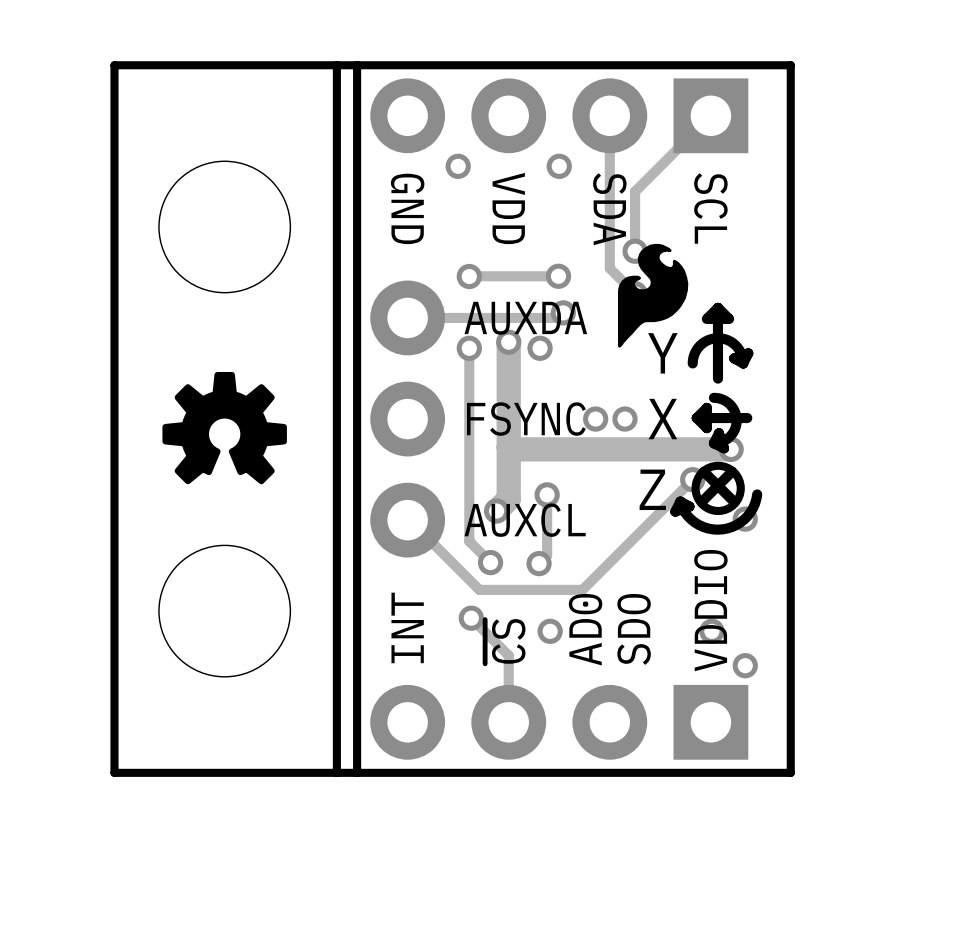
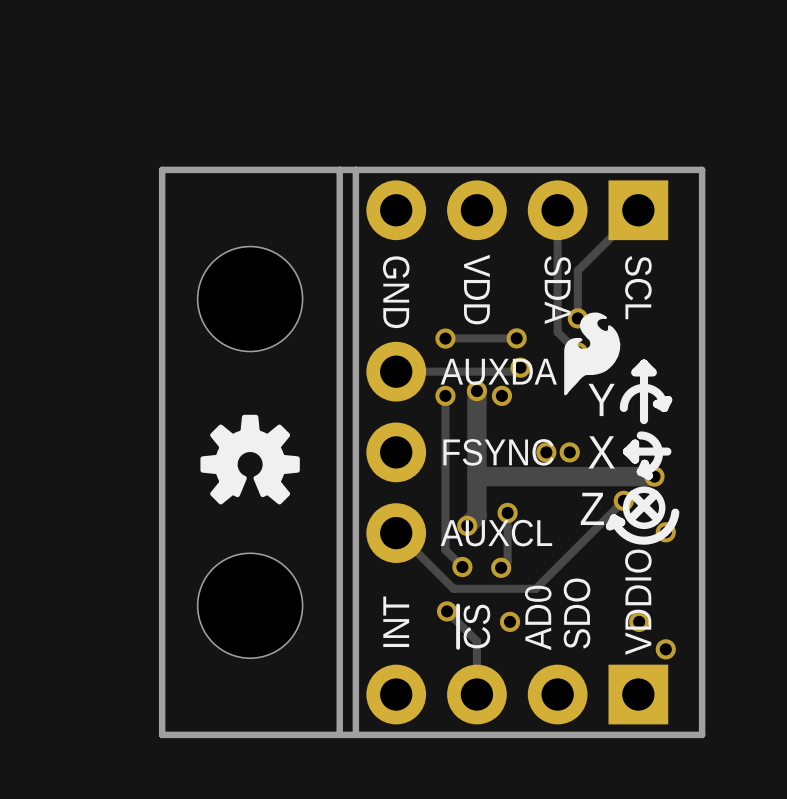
via: (458, 166) -> none
via: (559, 166) -> none

